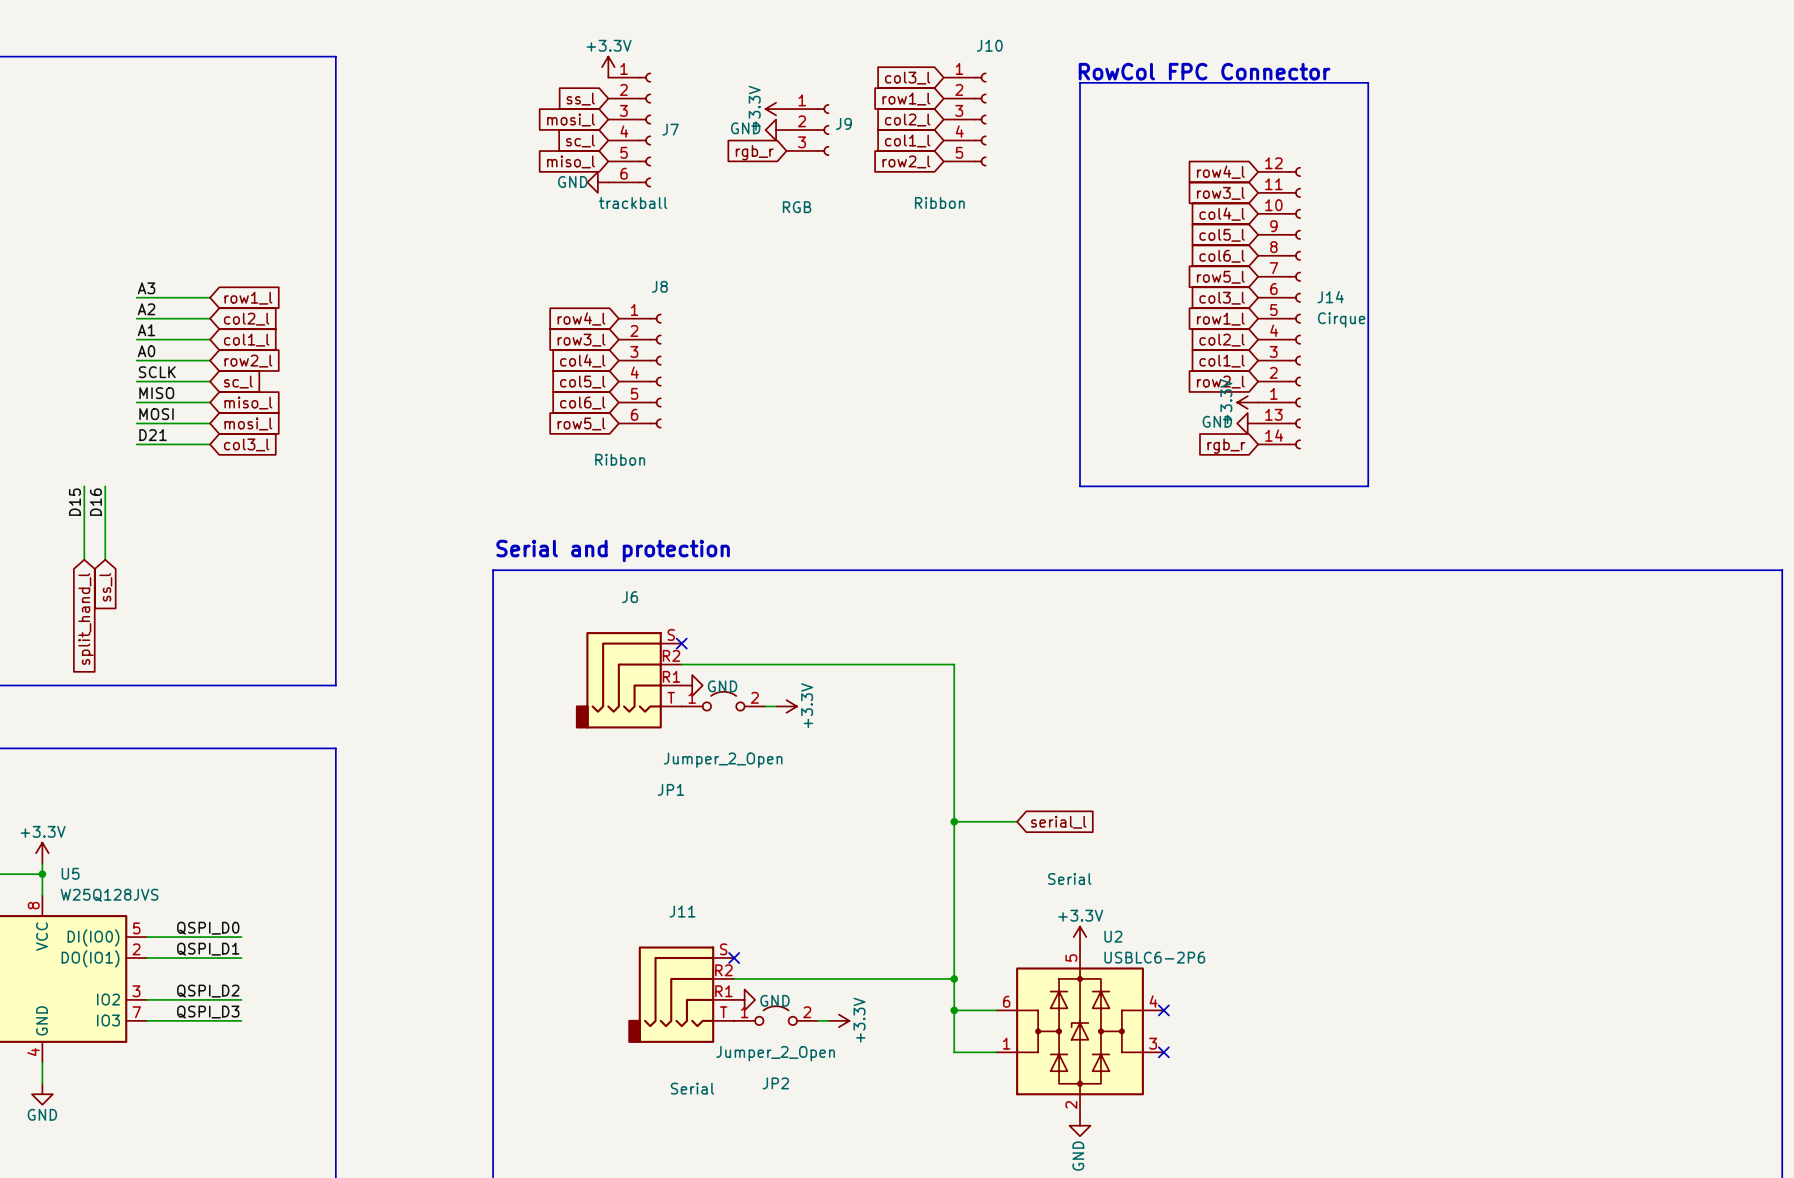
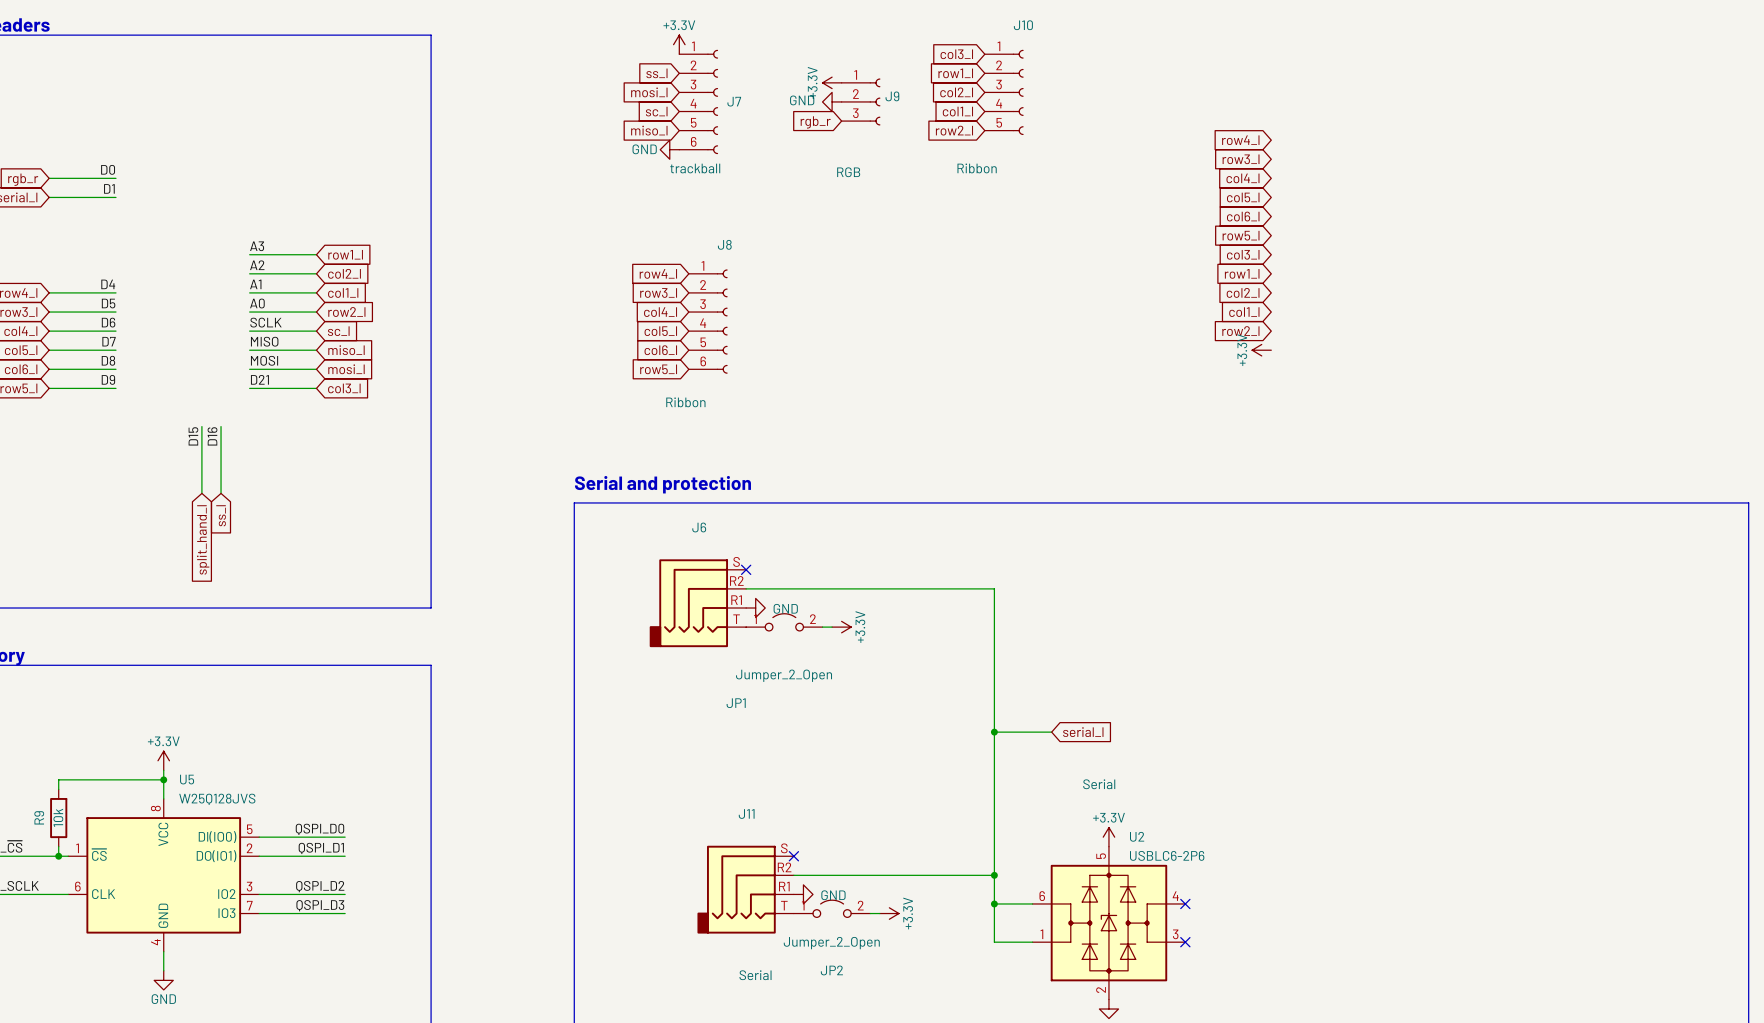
text: RowCol FPC Connector (1204, 71) -> none
line: (1080, 82) (1080, 486) (1368, 486) (1368, 82) (1080, 82) -> none
J14: Cirque (1279, 308) -> none
power symbol: GND (1247, 423) -> none
global label: rgb_r (1226, 446) -> none

